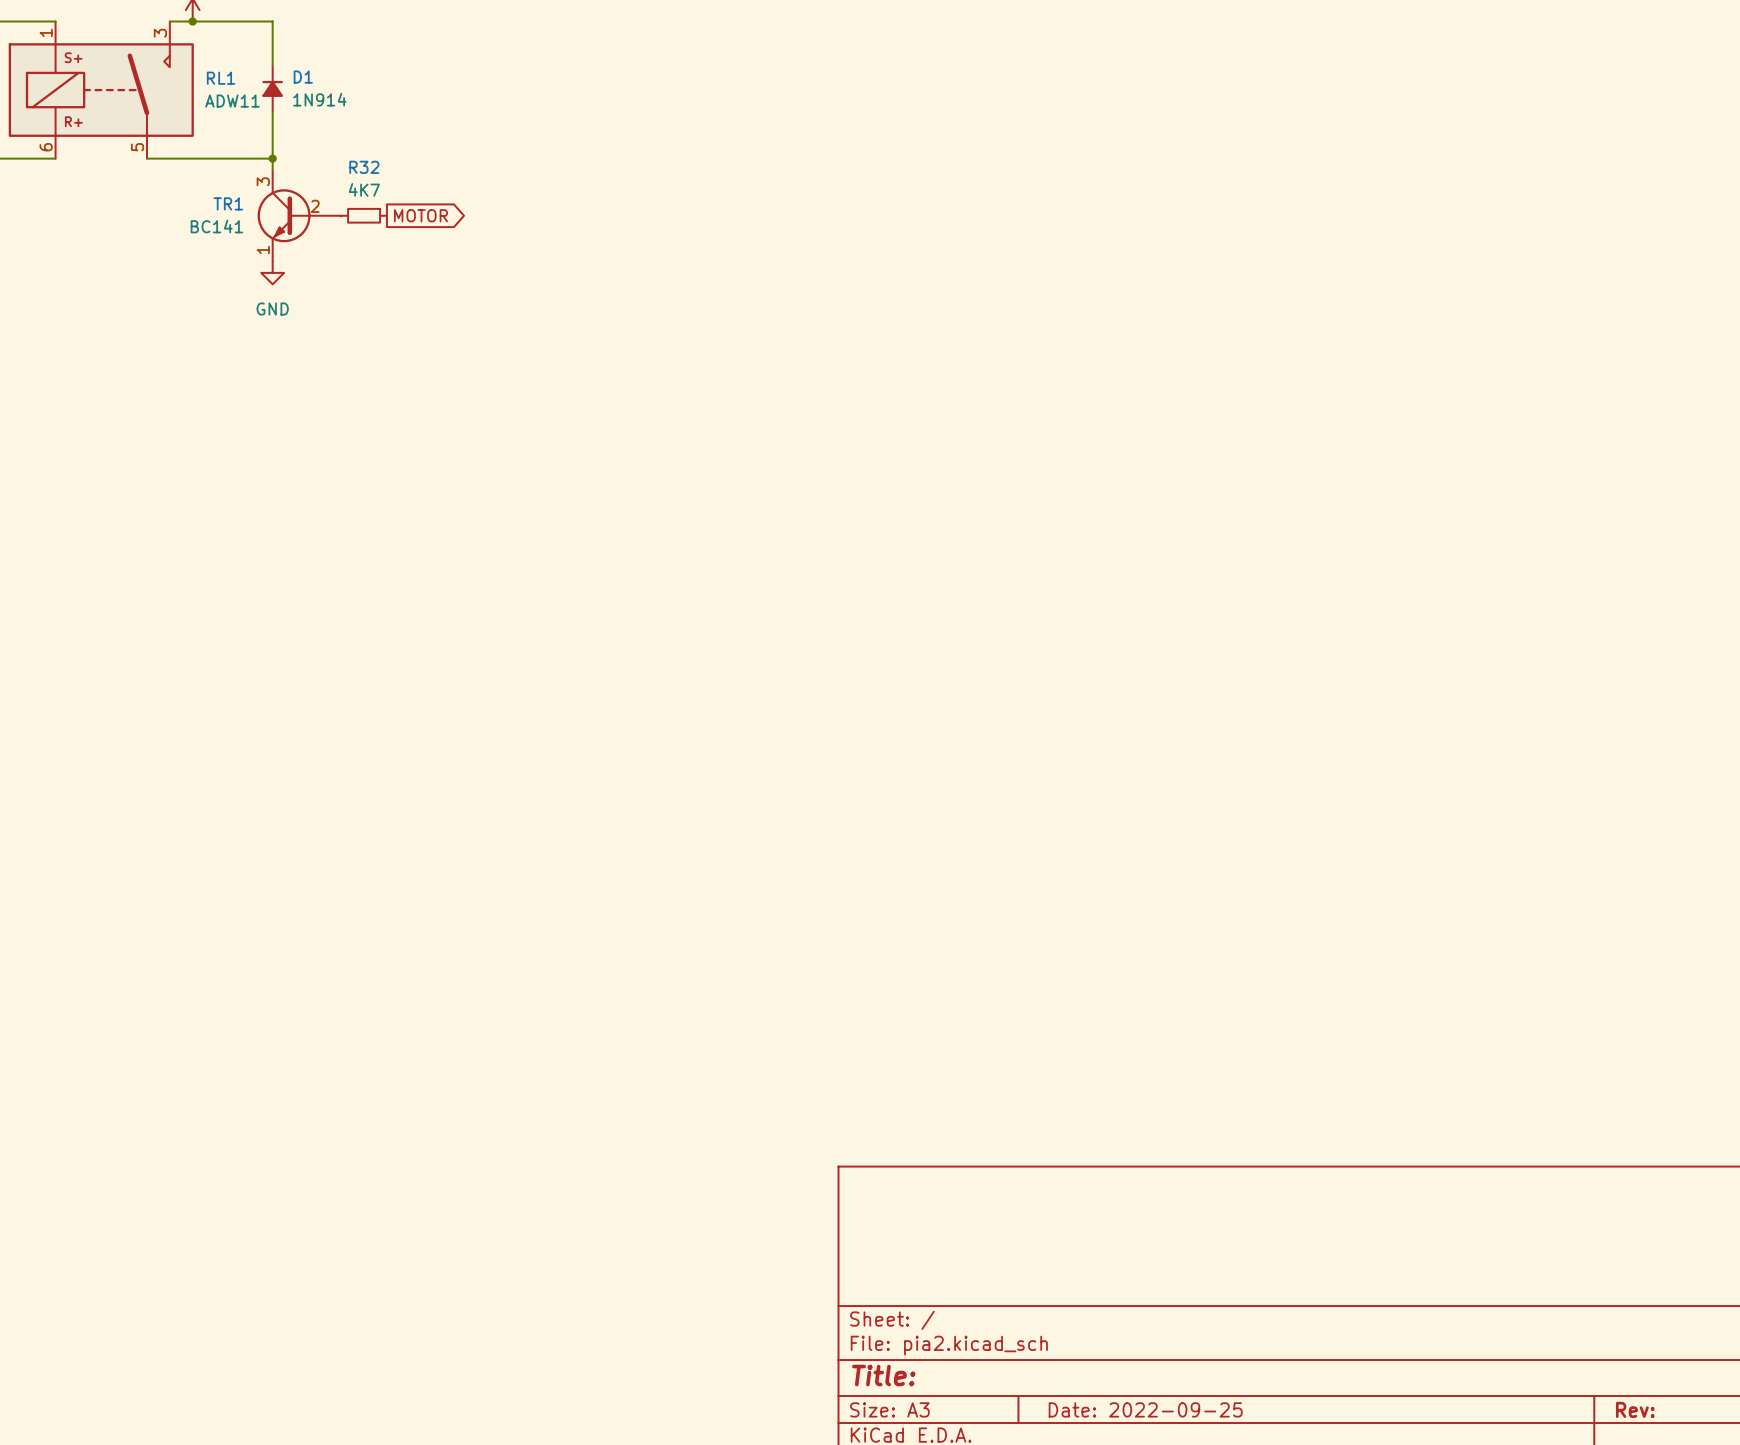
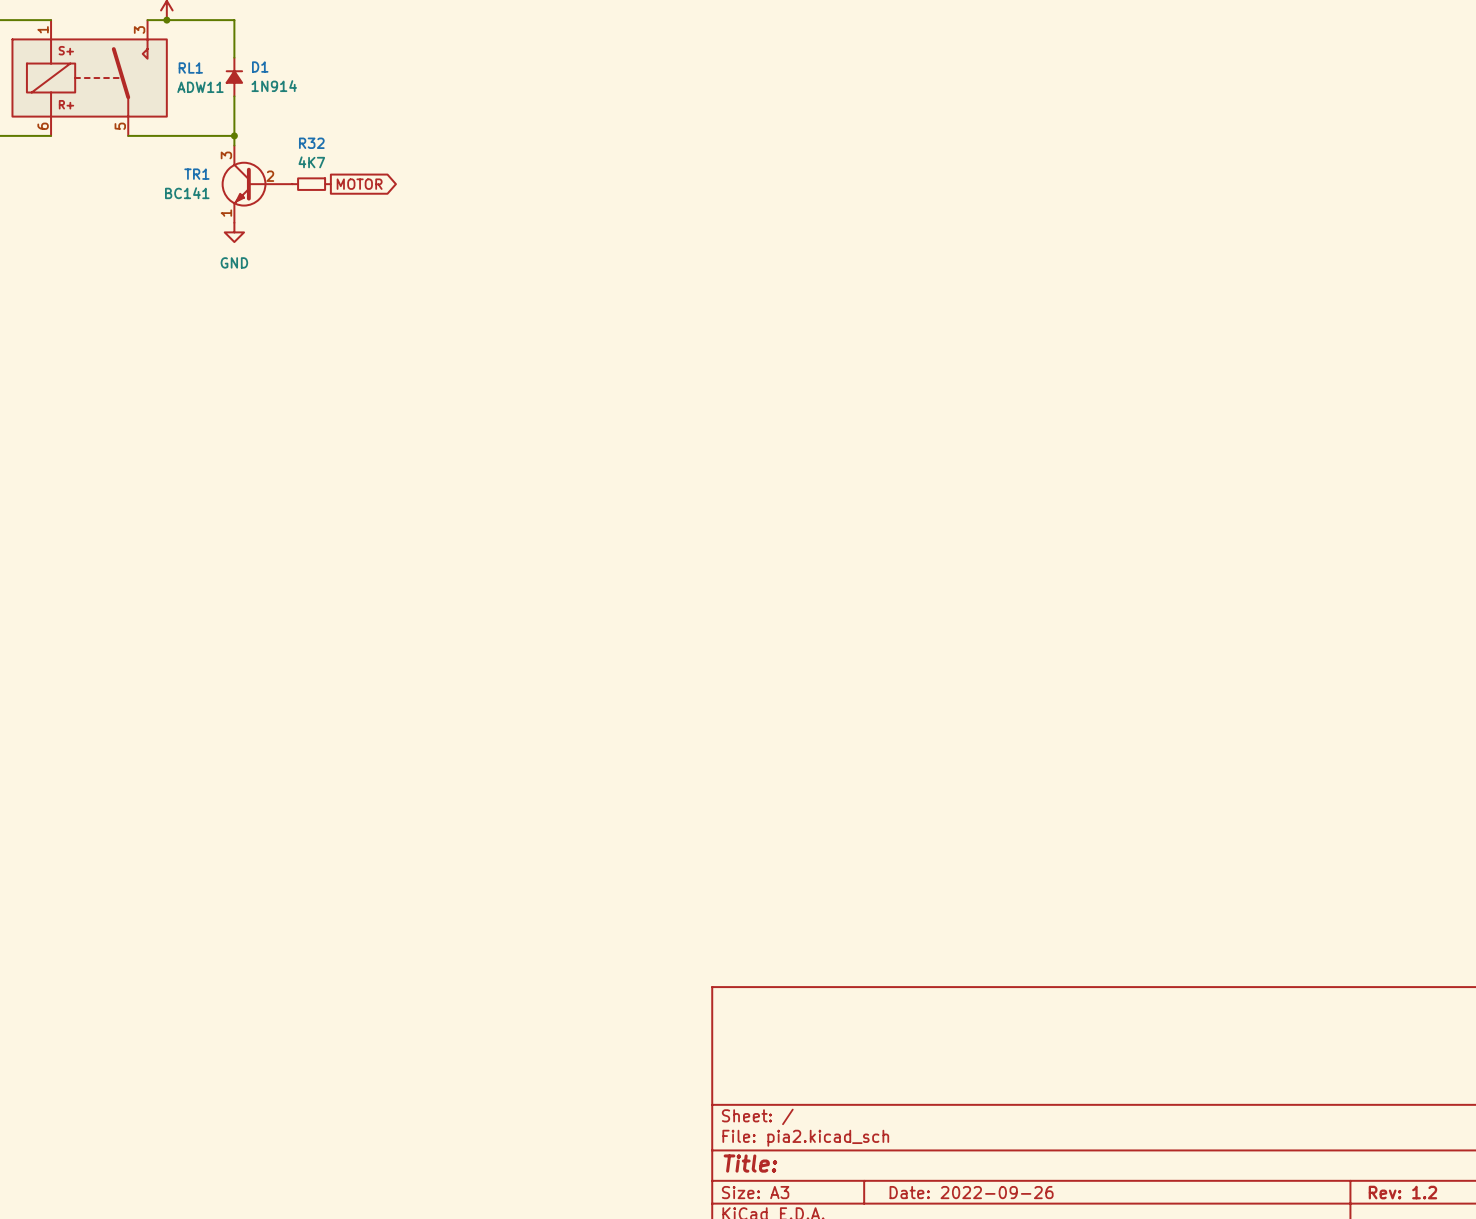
title block: Date: 2022-09-25 (1145, 1409) -> Date: 2022-09-26 (971, 1192)
title block: Rev: (1635, 1409) -> Rev: 1.2 (1402, 1192)

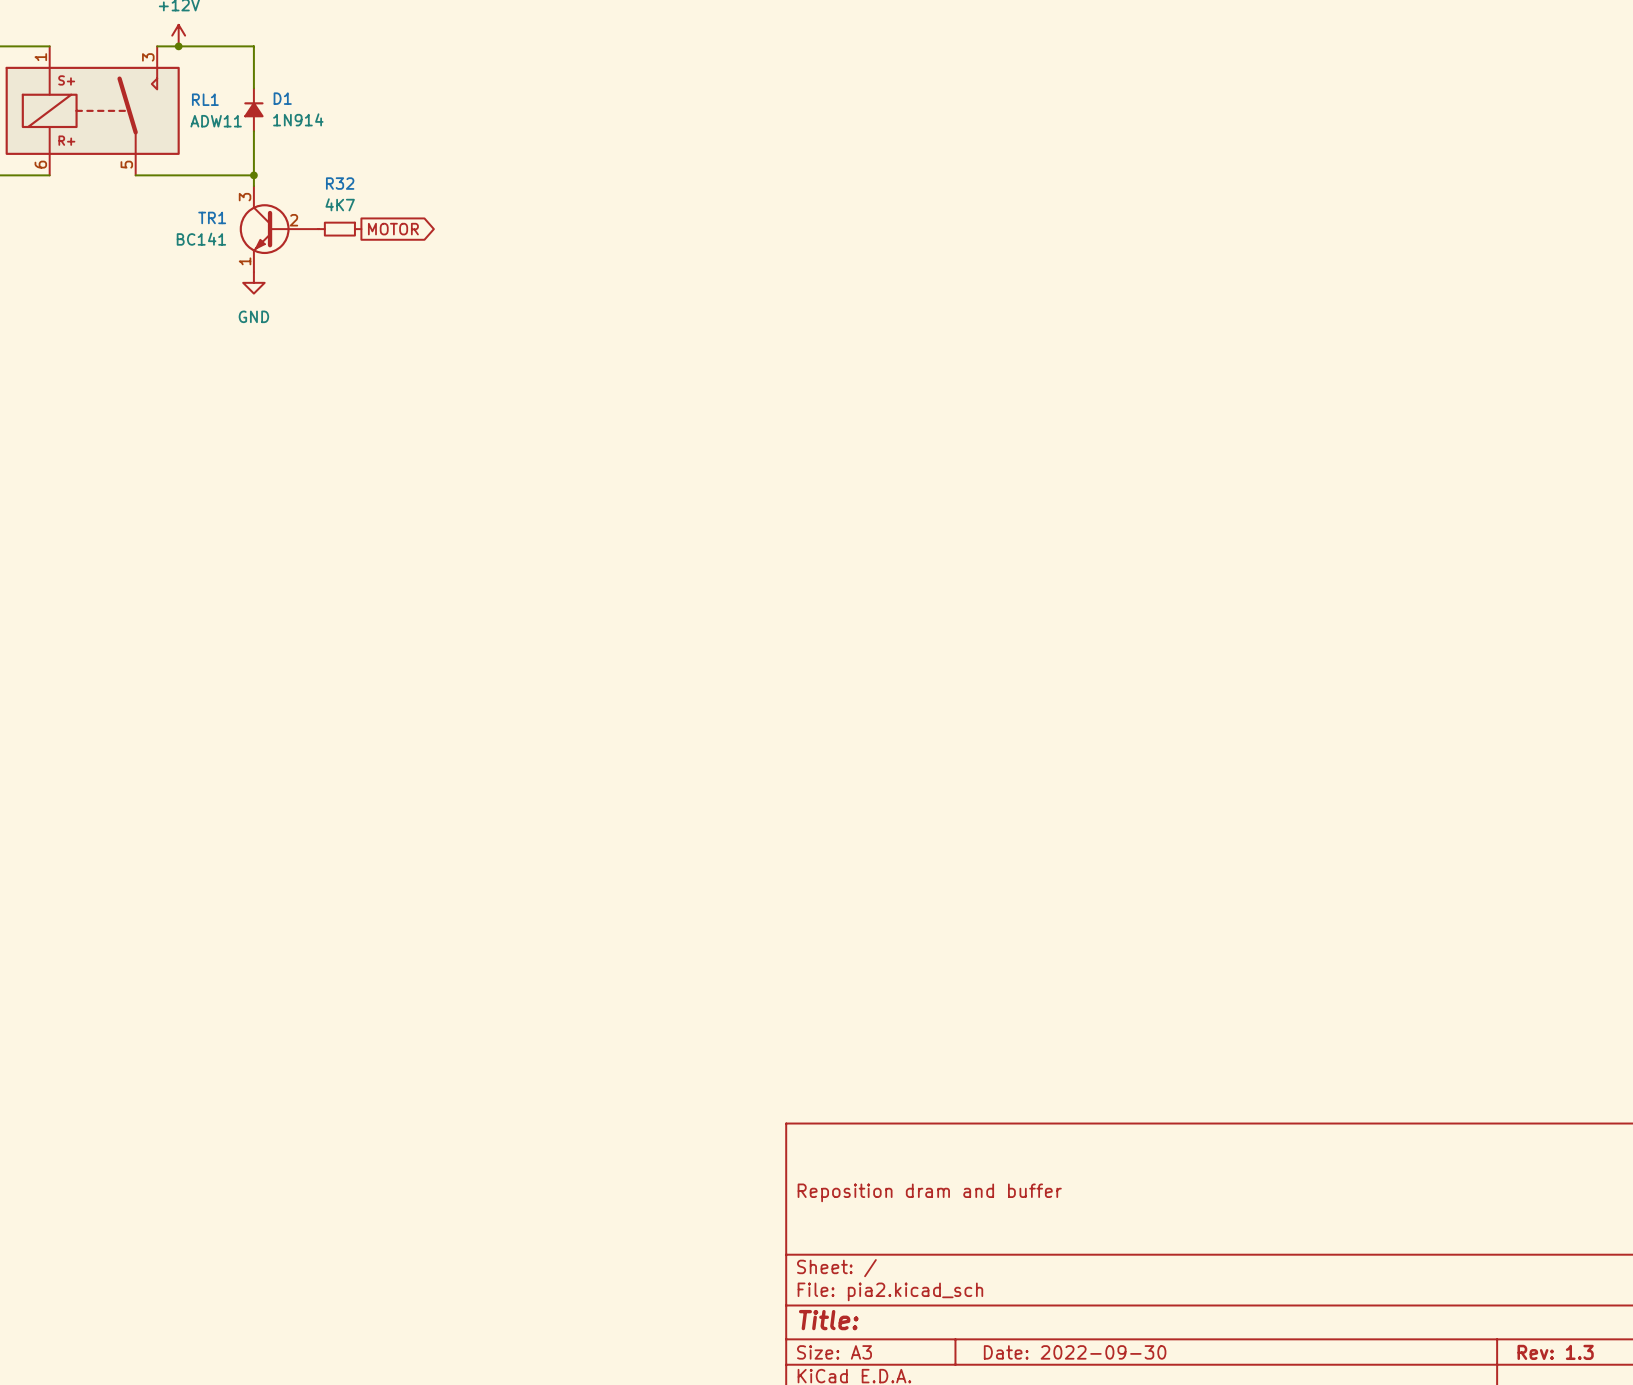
title block: none -> Reposition dram and buffer (929, 1192)
title block: Date: 2022-09-26 (971, 1192) -> Date: 2022-09-30 (1075, 1352)
title block: Rev: 1.2 (1402, 1192) -> Rev: 1.3 (1555, 1352)

